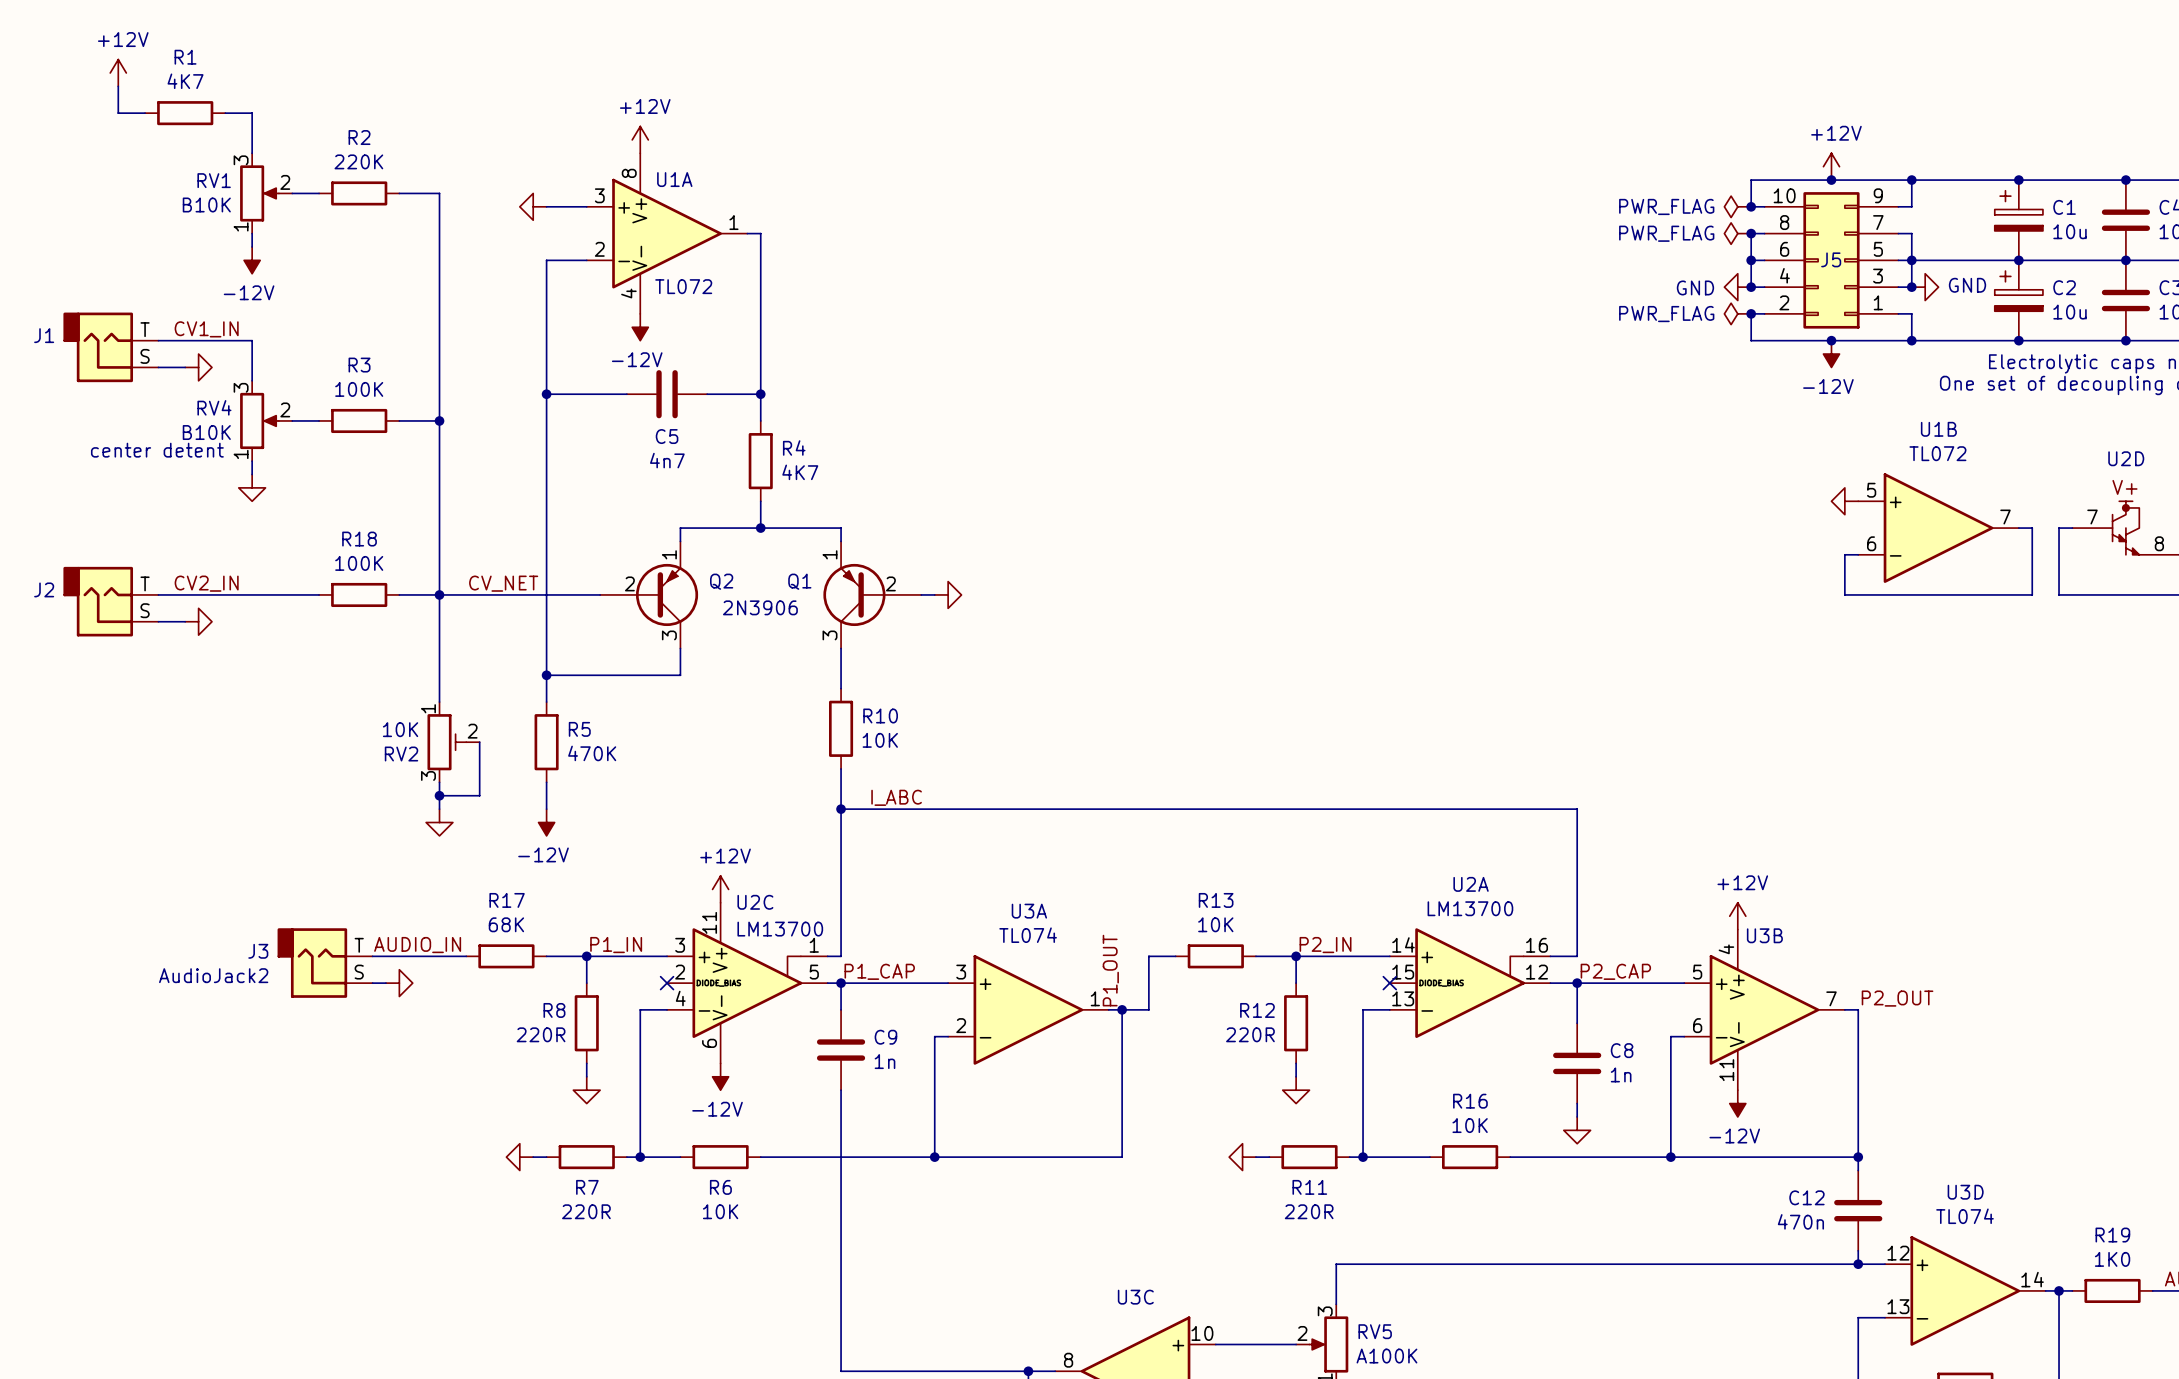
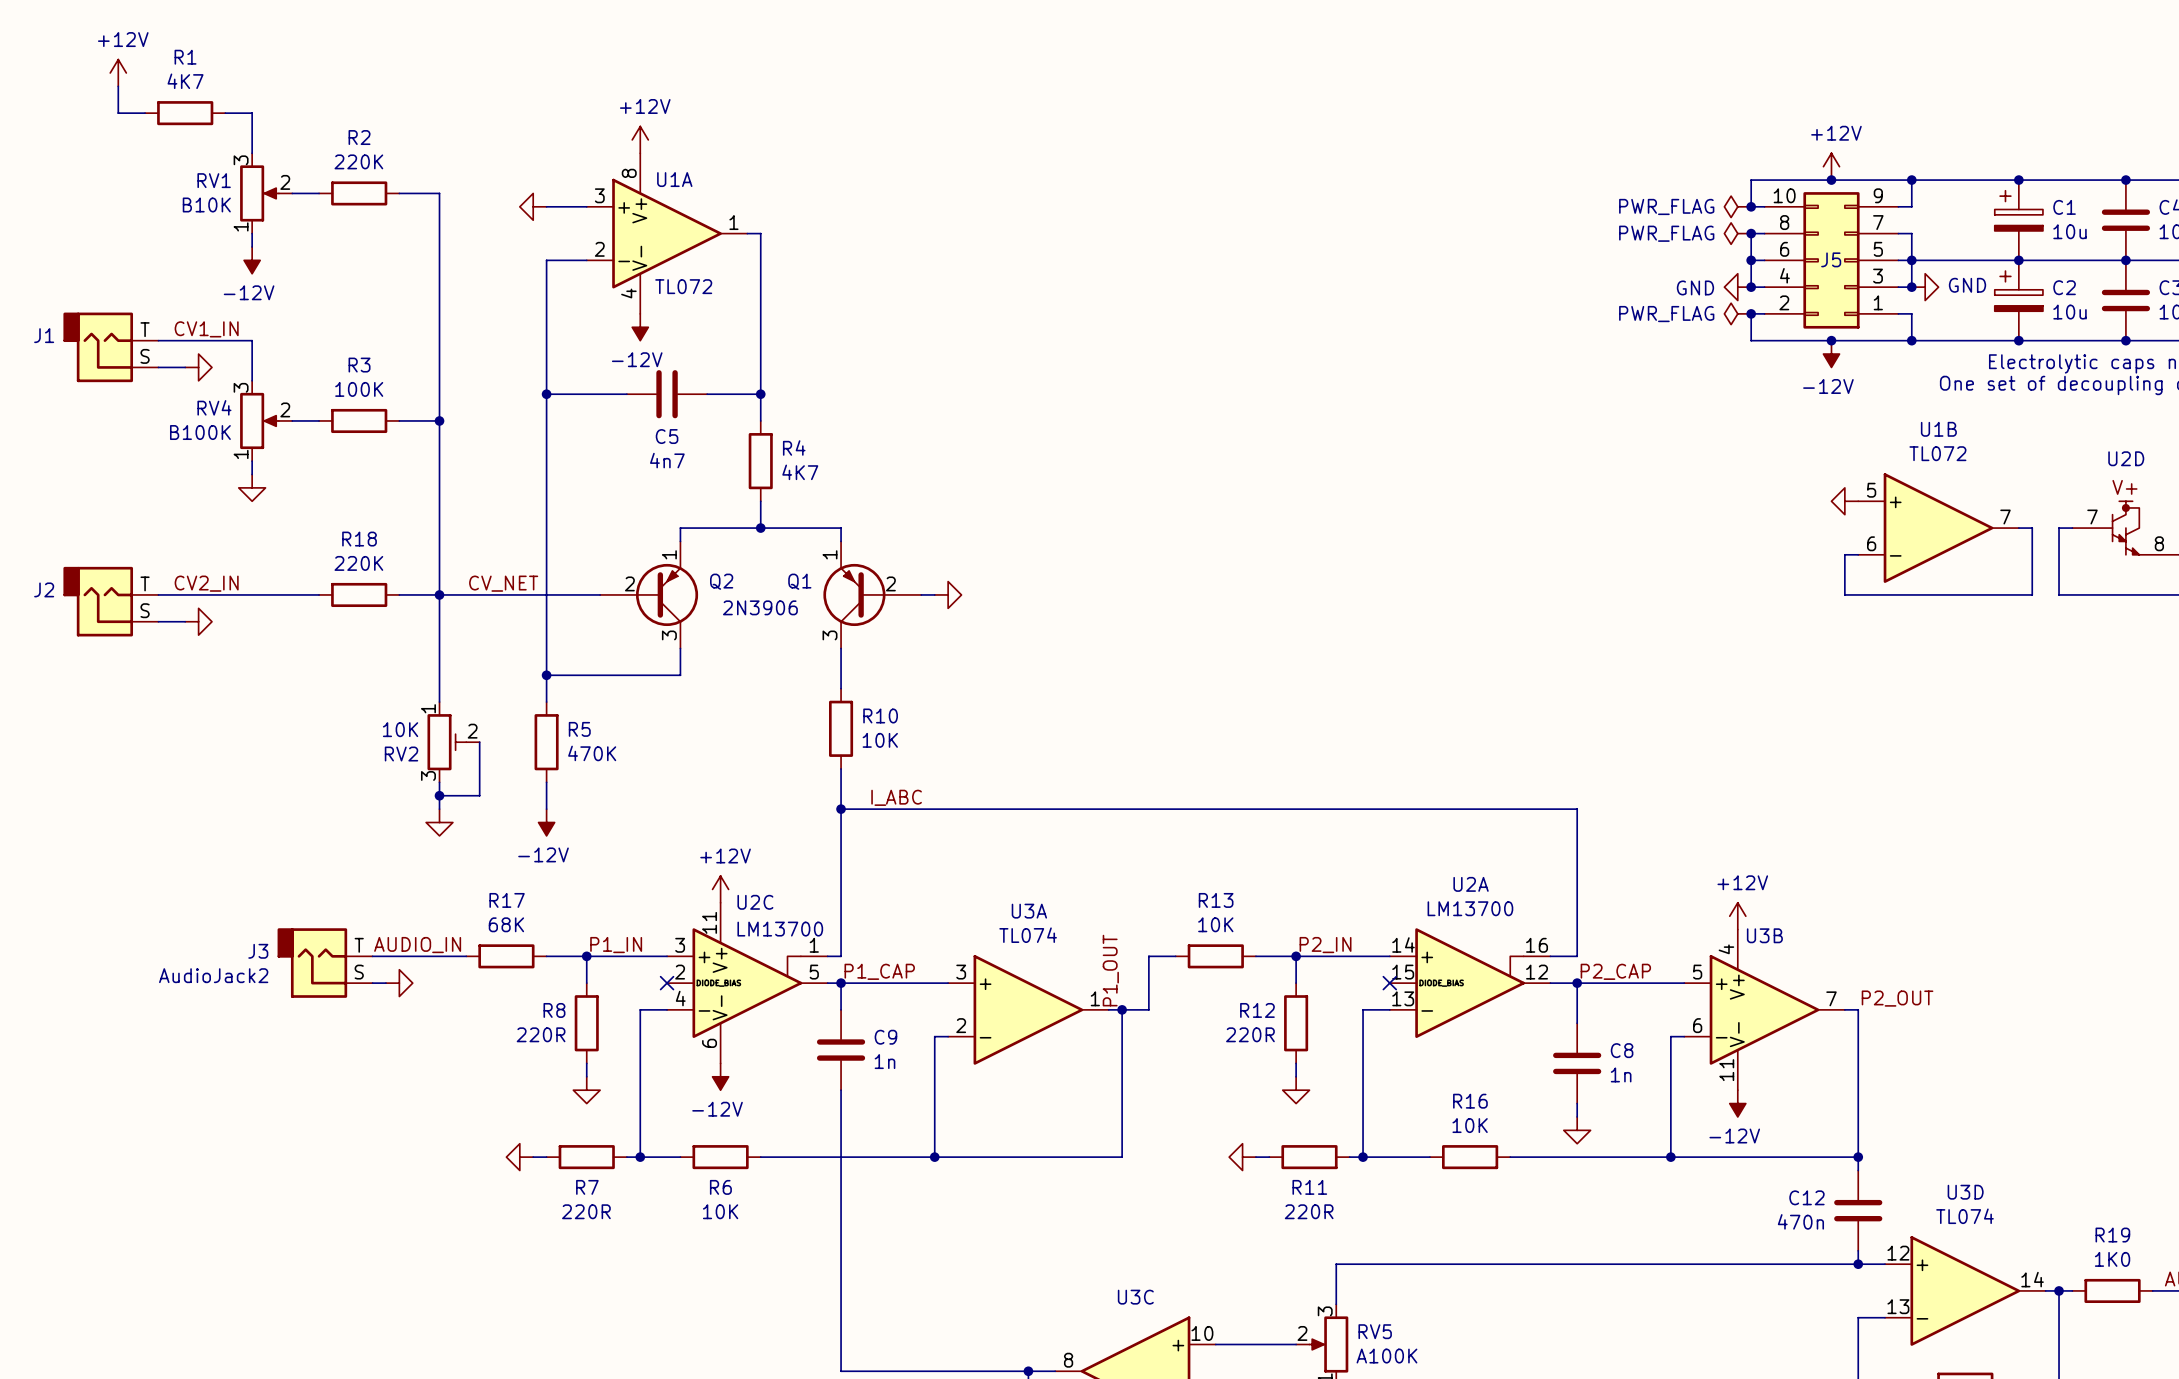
RV4 value: B10K (206, 432) -> B100K (200, 432)
text: center detent (157, 450) -> none
R18 value: 100K (359, 563) -> 220K (358, 563)

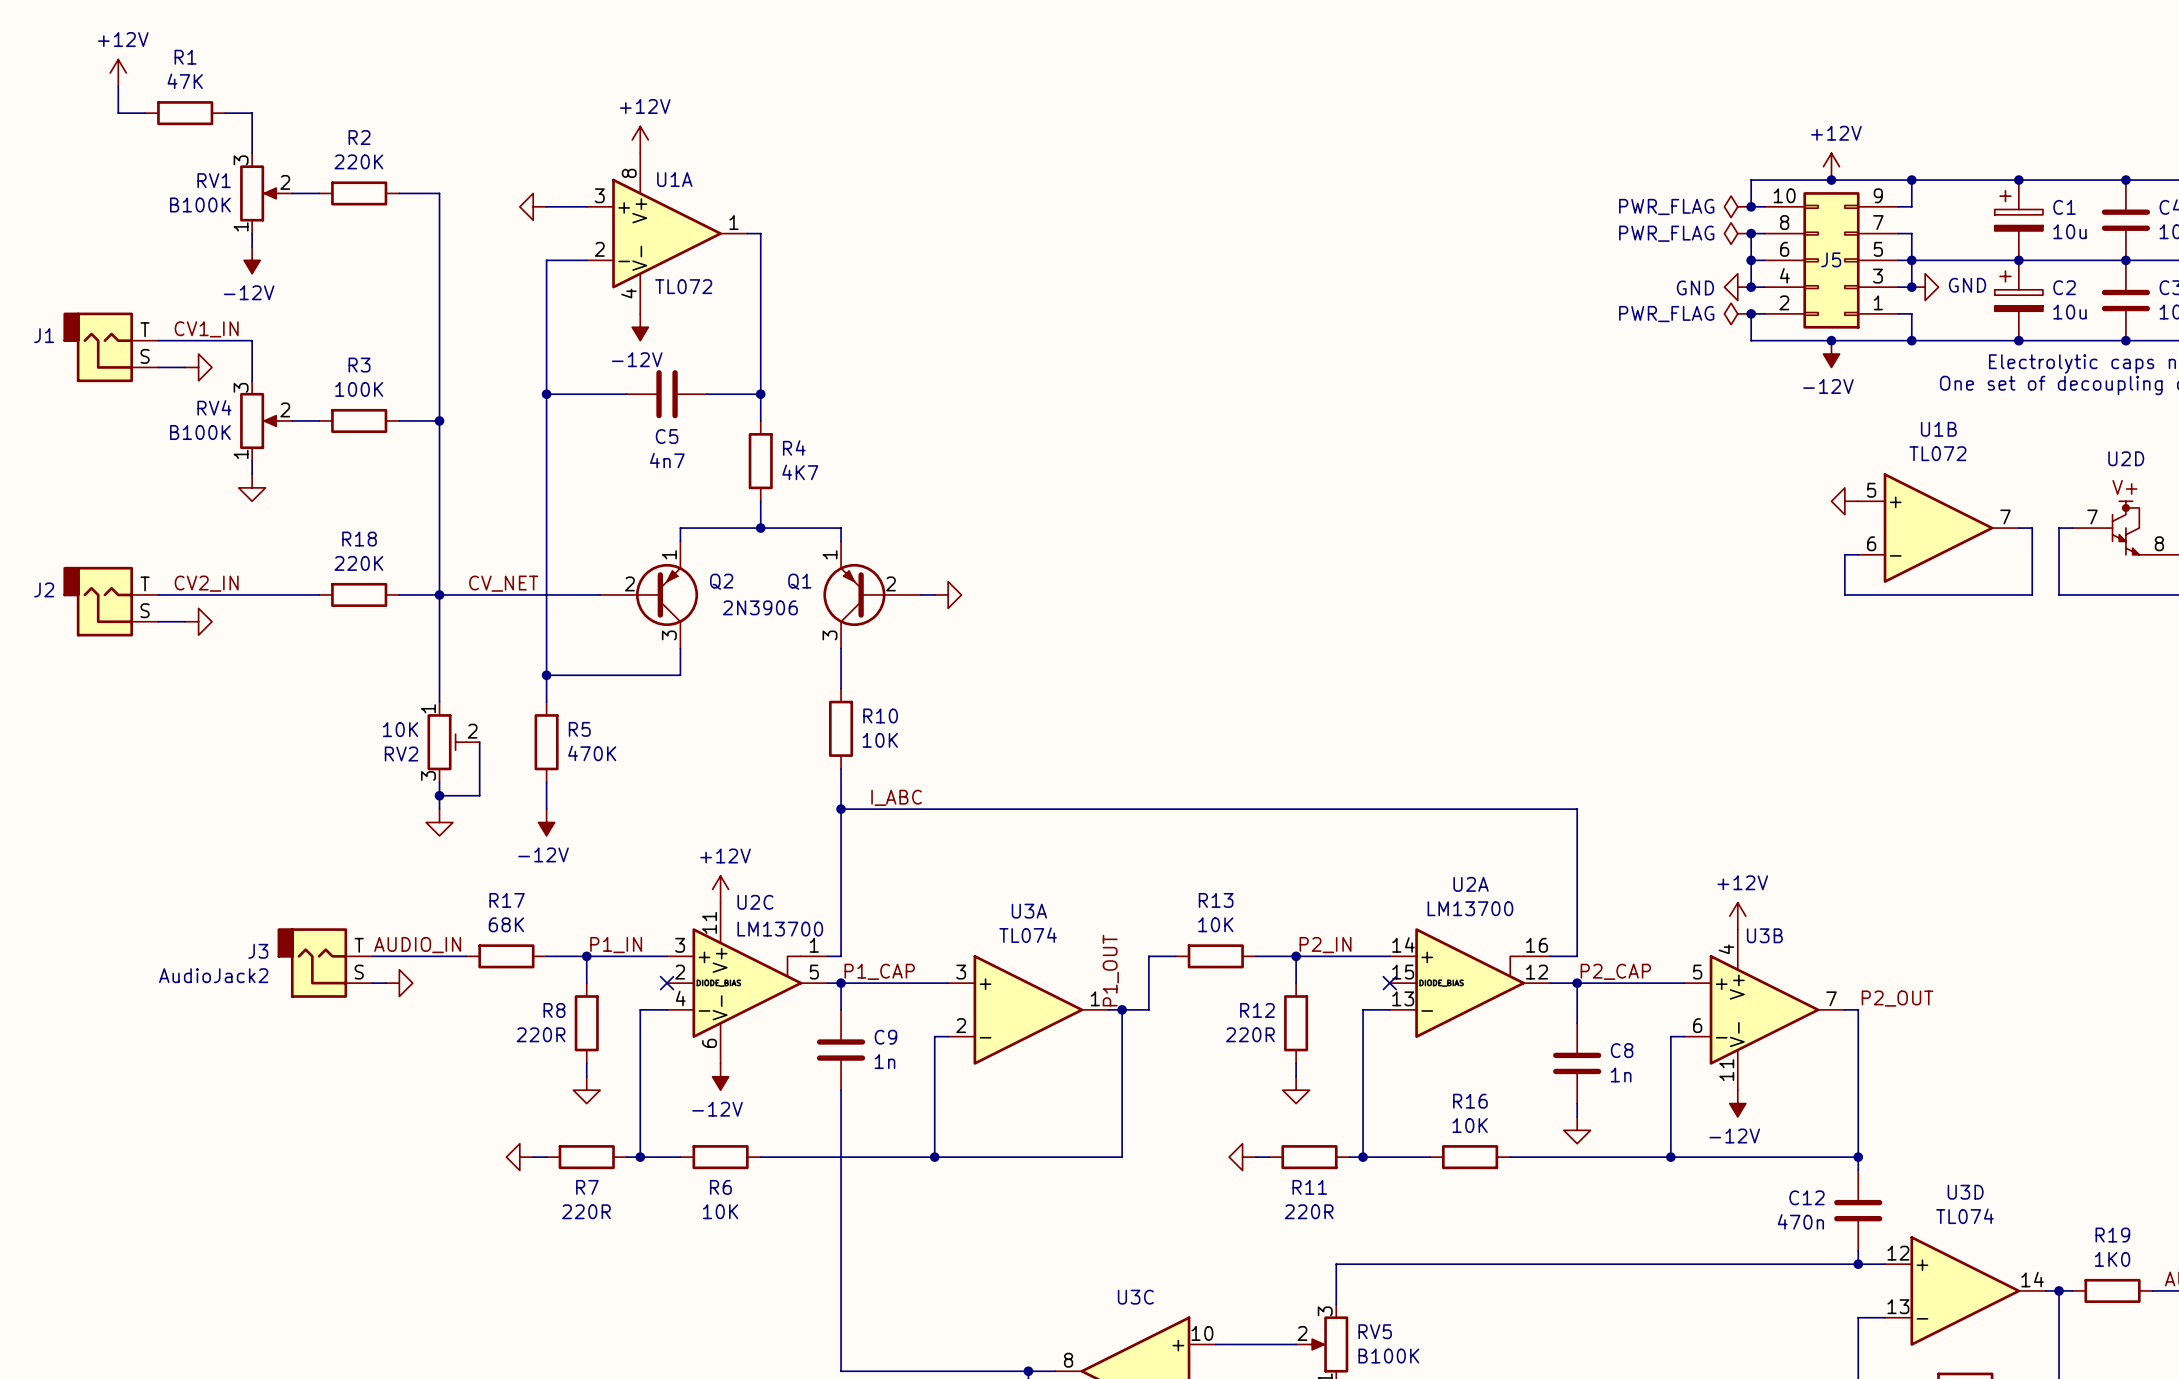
R1 value: 4K7 (185, 81) -> 47K (185, 81)
RV1 value: B10K (206, 204) -> B100K (200, 204)
RV5 value: A100K (1386, 1356) -> B100K (1388, 1356)

